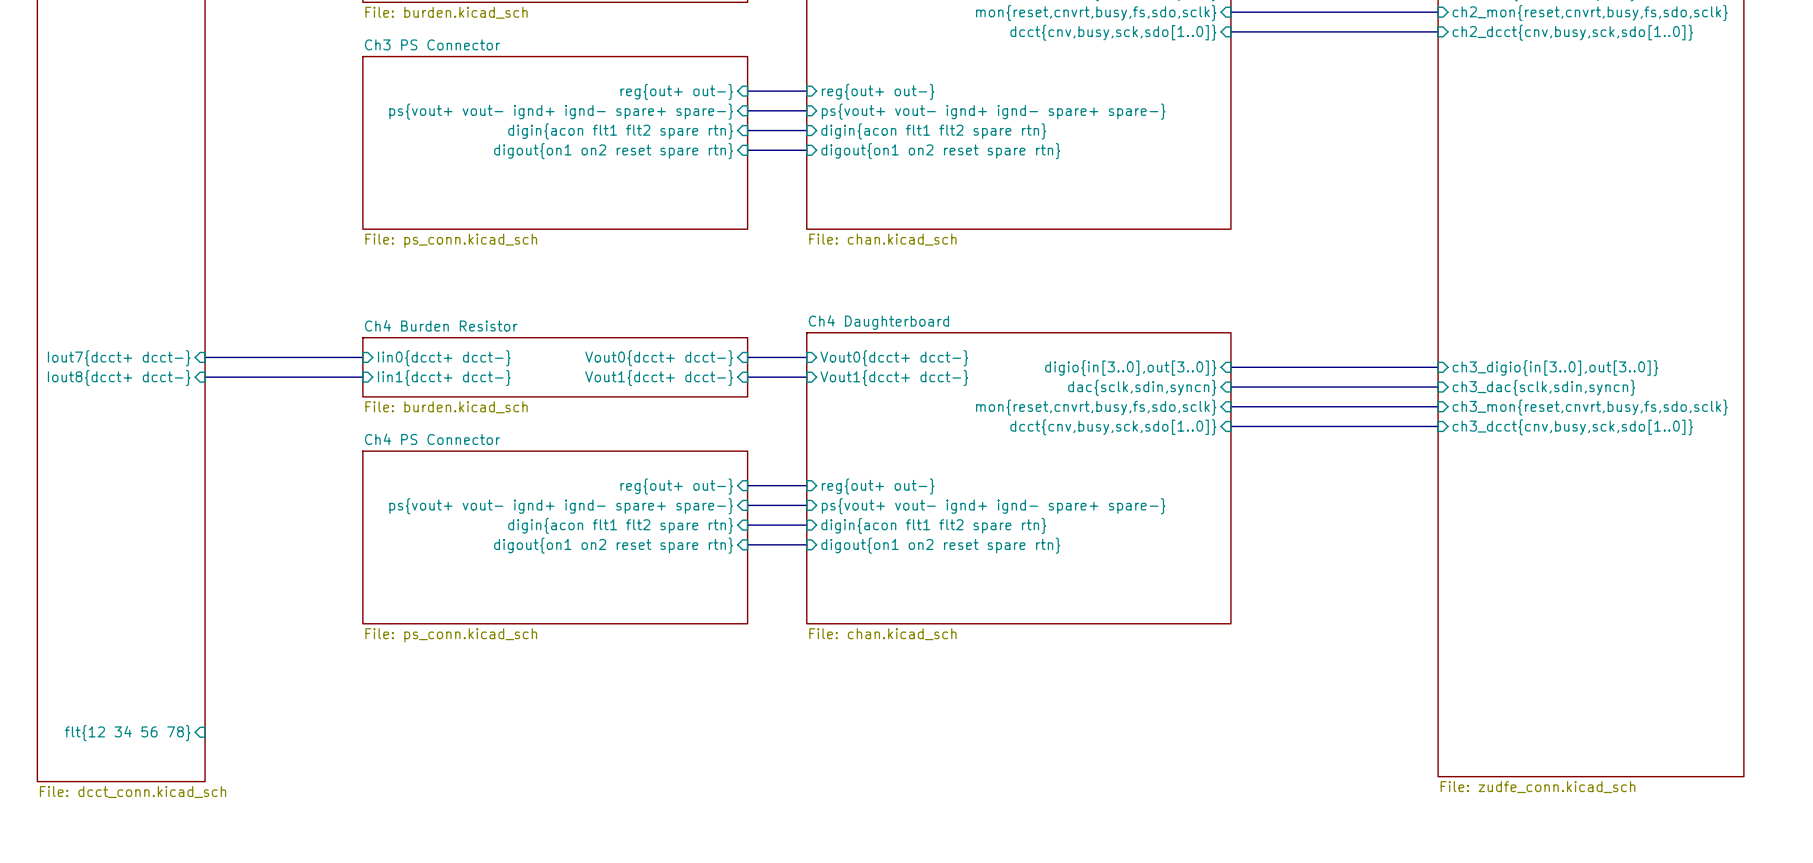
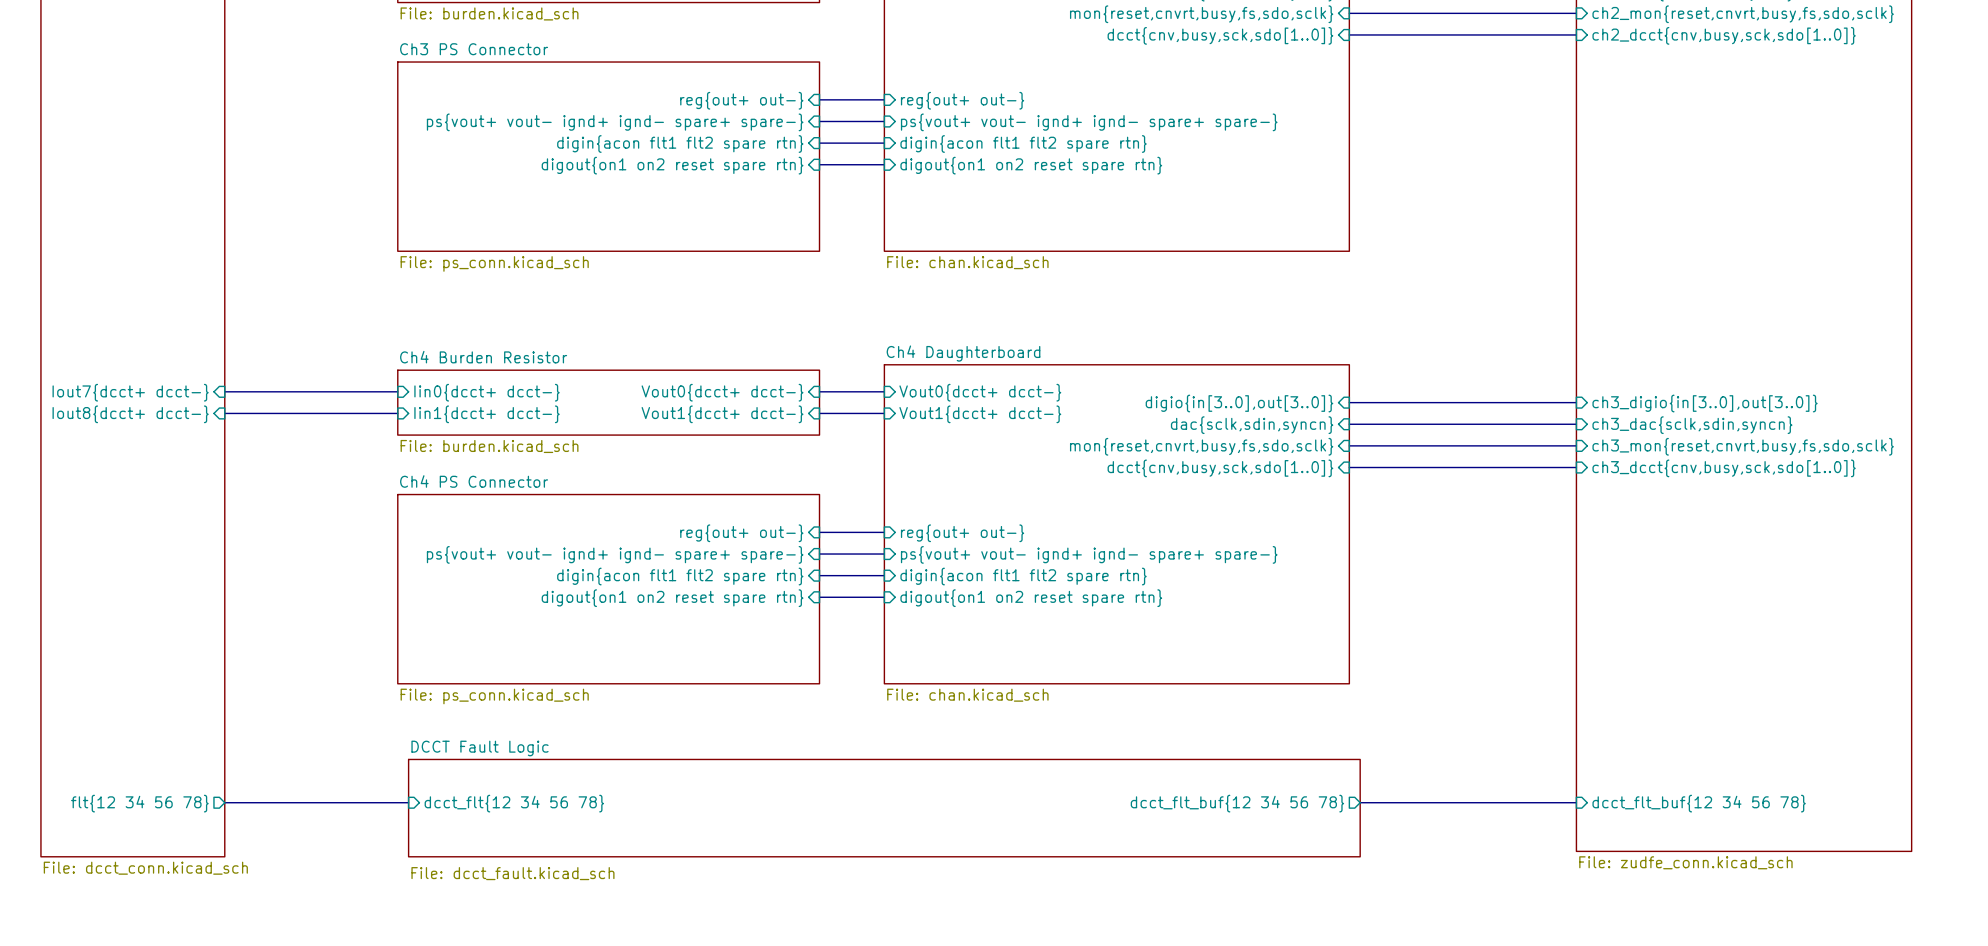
bus: none -> (224, 802) (408, 802)
bus: none -> (1360, 802) (1576, 802)
sheet pin shape: input (127, 733) -> output (139, 803)
sheet pin: none -> dcct_flt{12 34 56 78} (514, 803)
sheet pin: none -> dcct_flt_buf{12 34 56 78} (1237, 803)
sheet pin: none -> dcct_flt_buf{12 34 56 78} (1699, 803)
sheet DCCT Fault Logic: none -> File: dcct_fault.kicad_sch (884, 808)

